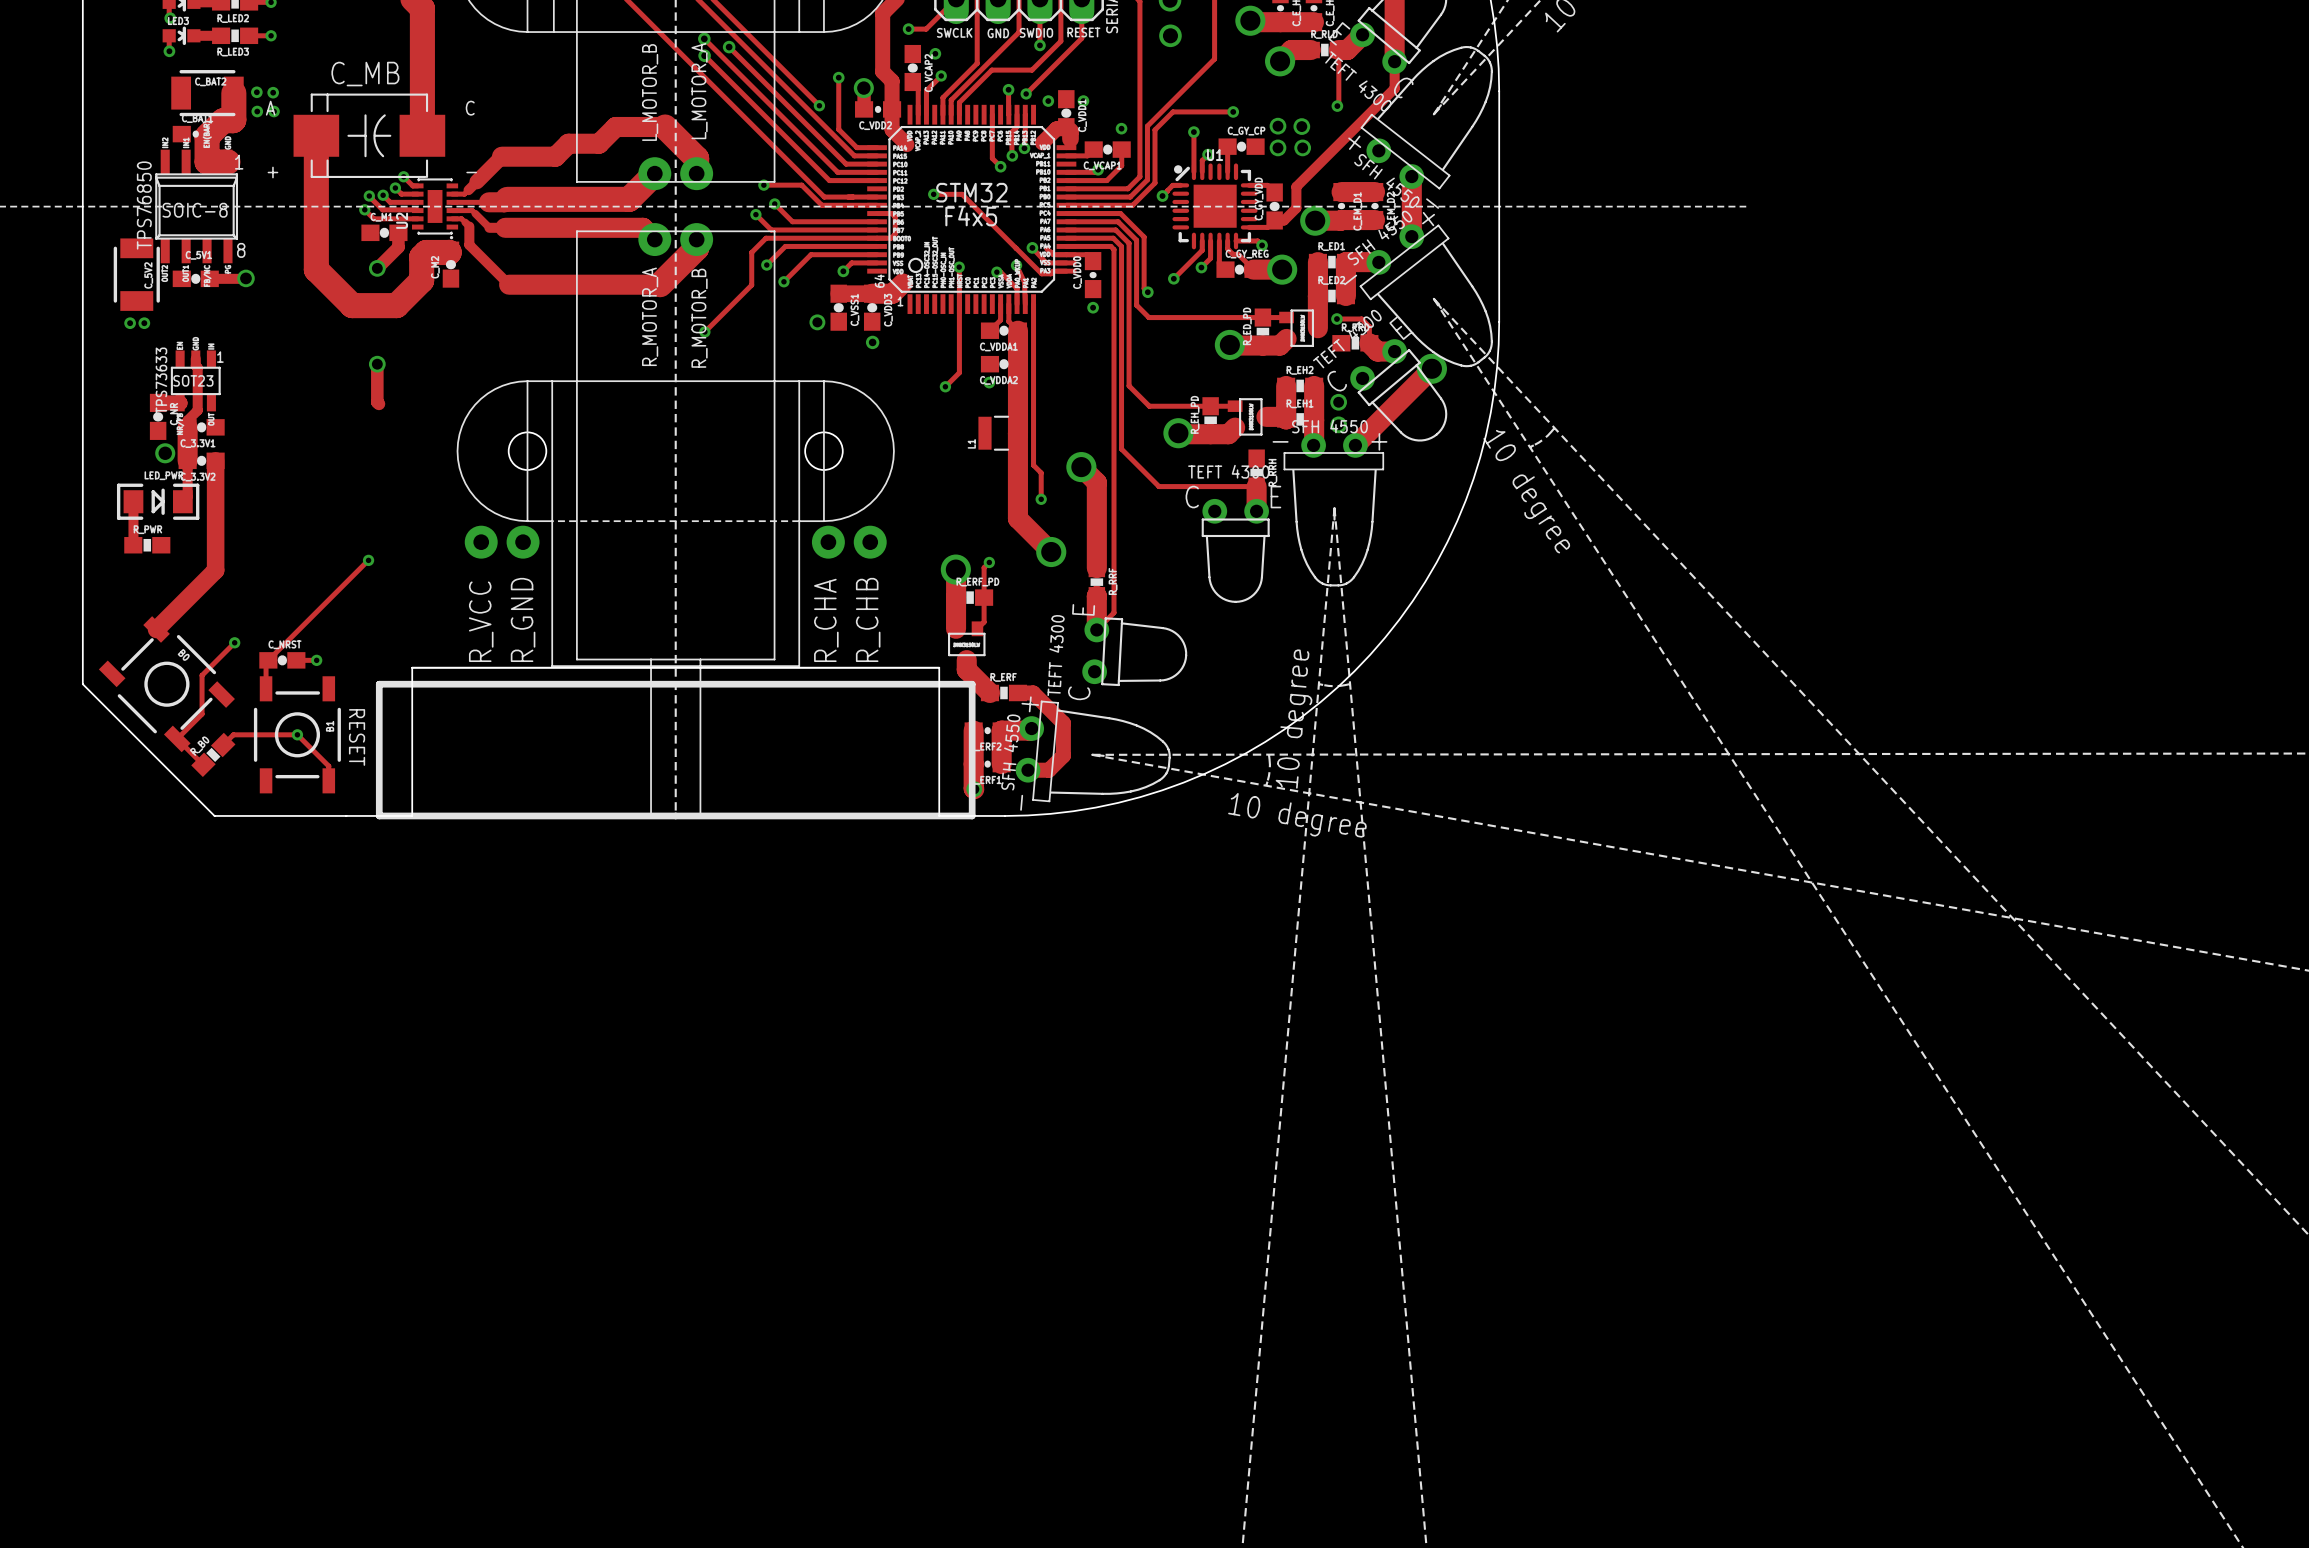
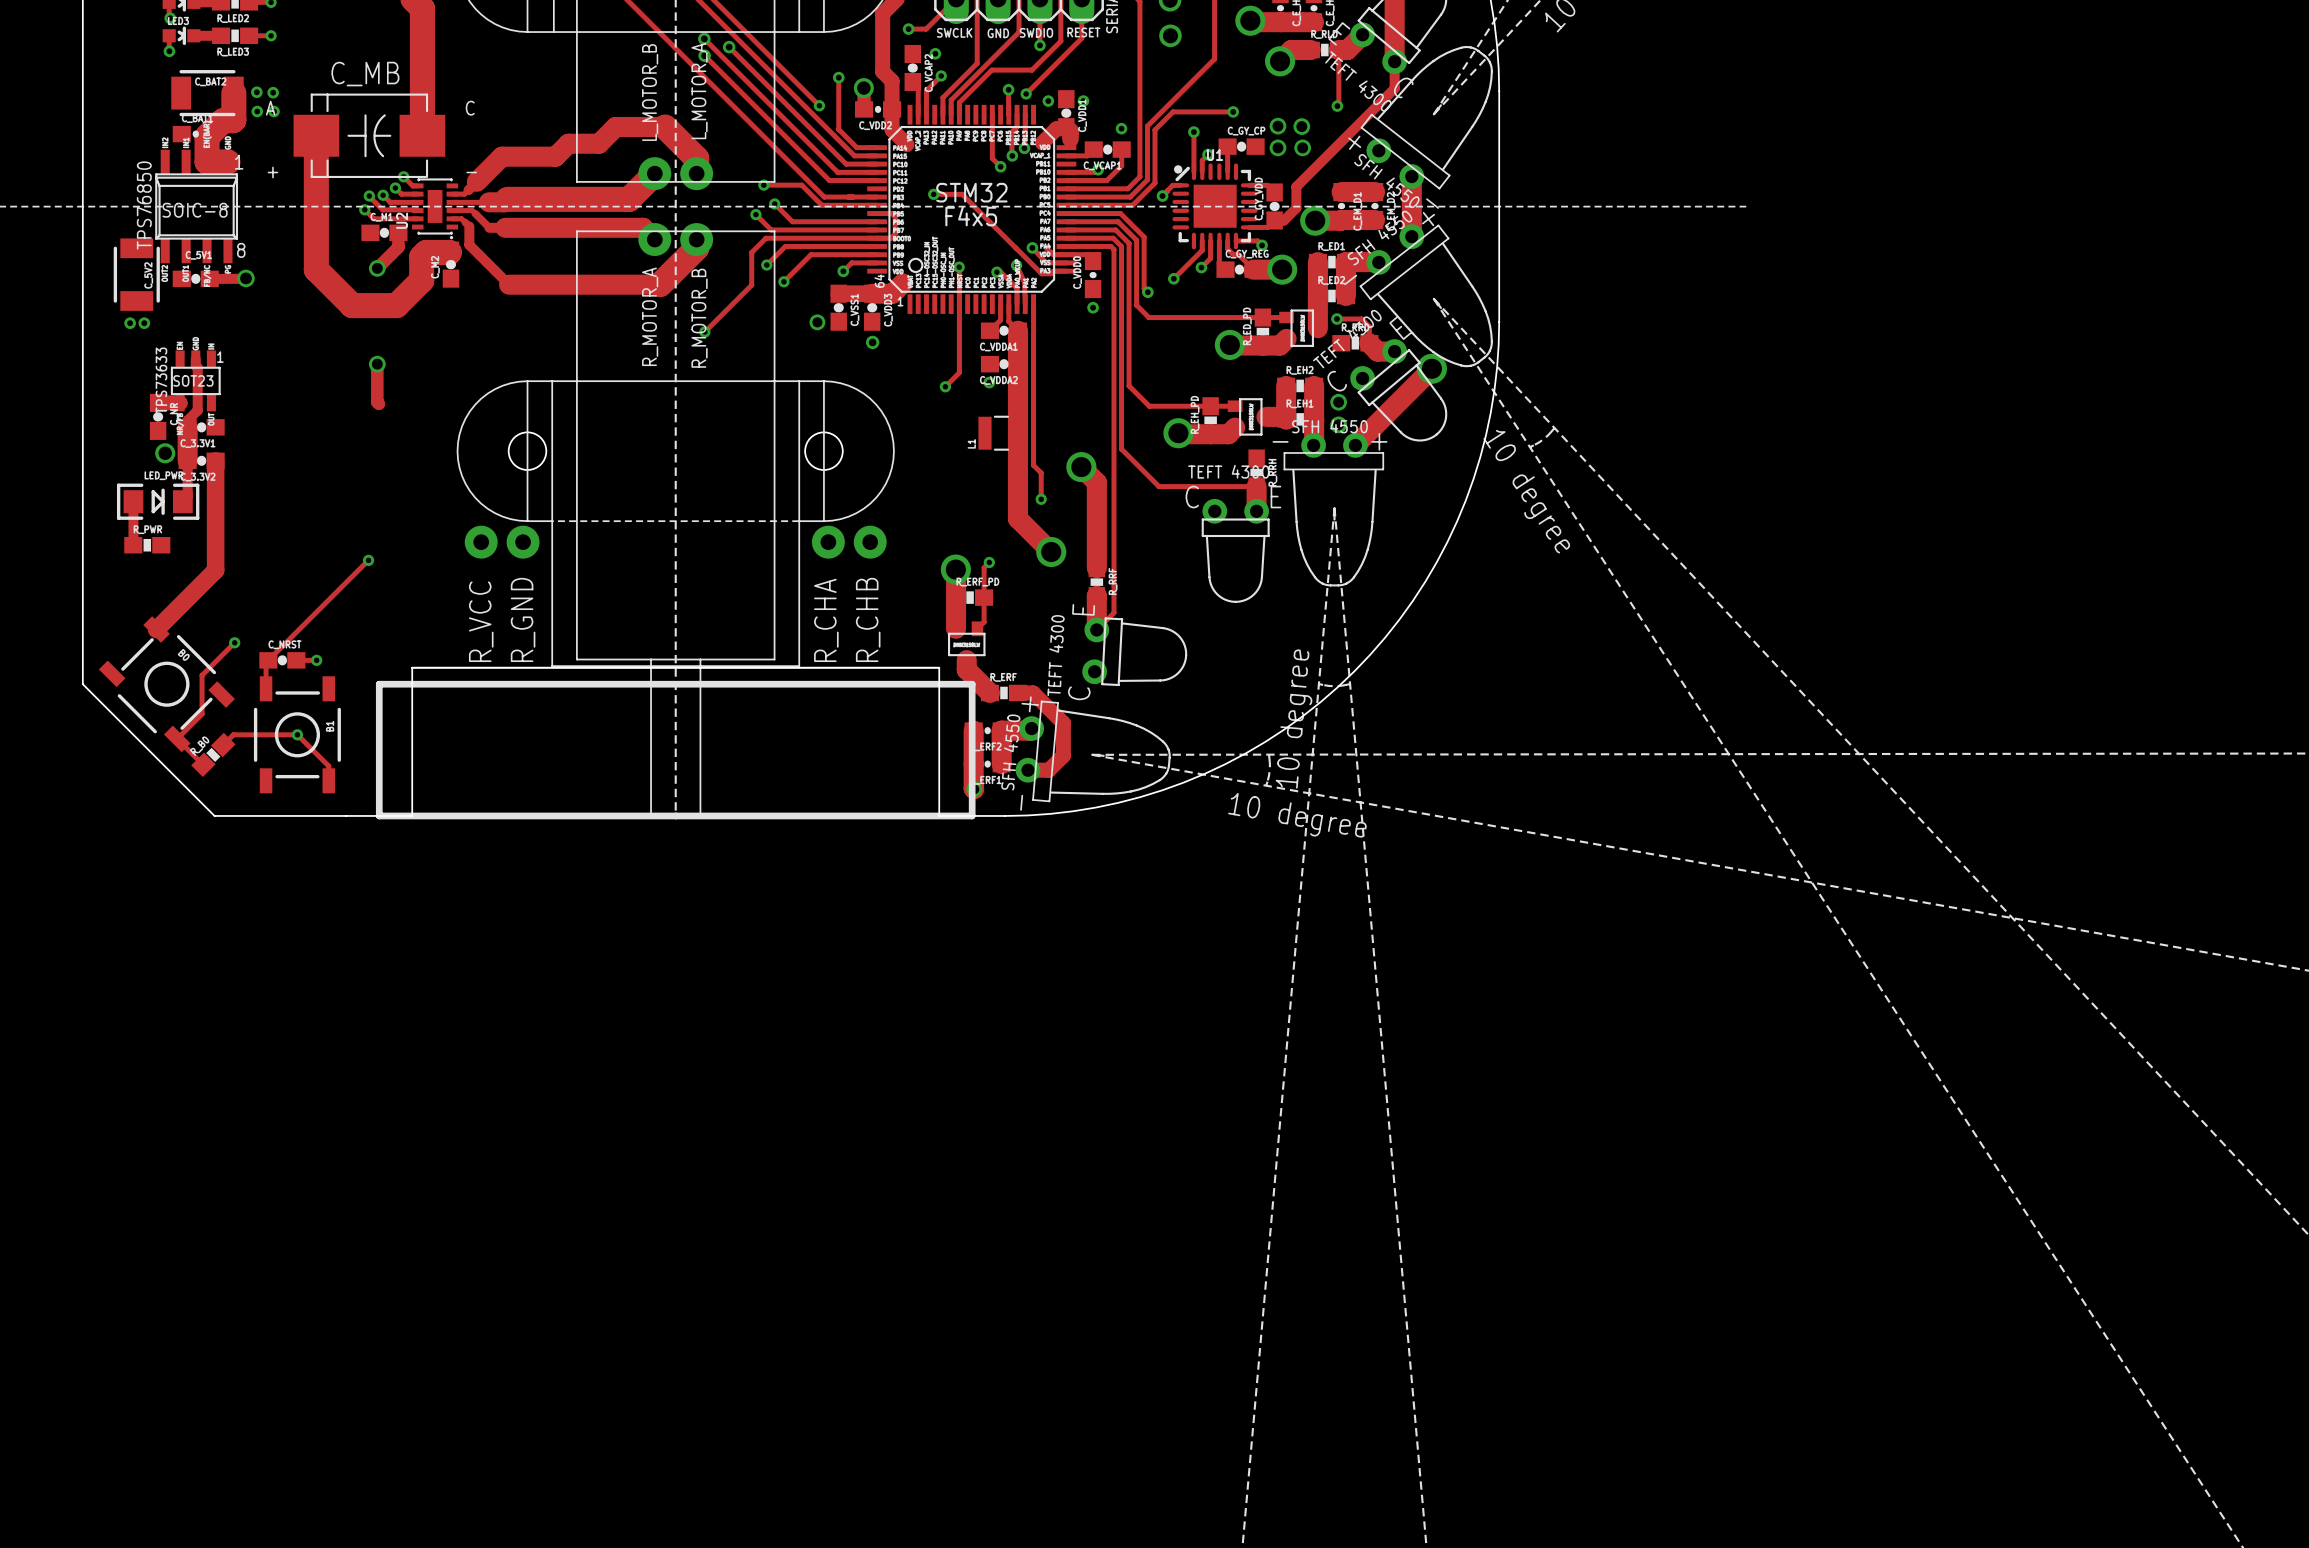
track width: thin (501, 156) (476, 181) -> thick (501, 156) (476, 181)
text: RESET (357, 737) -> none

